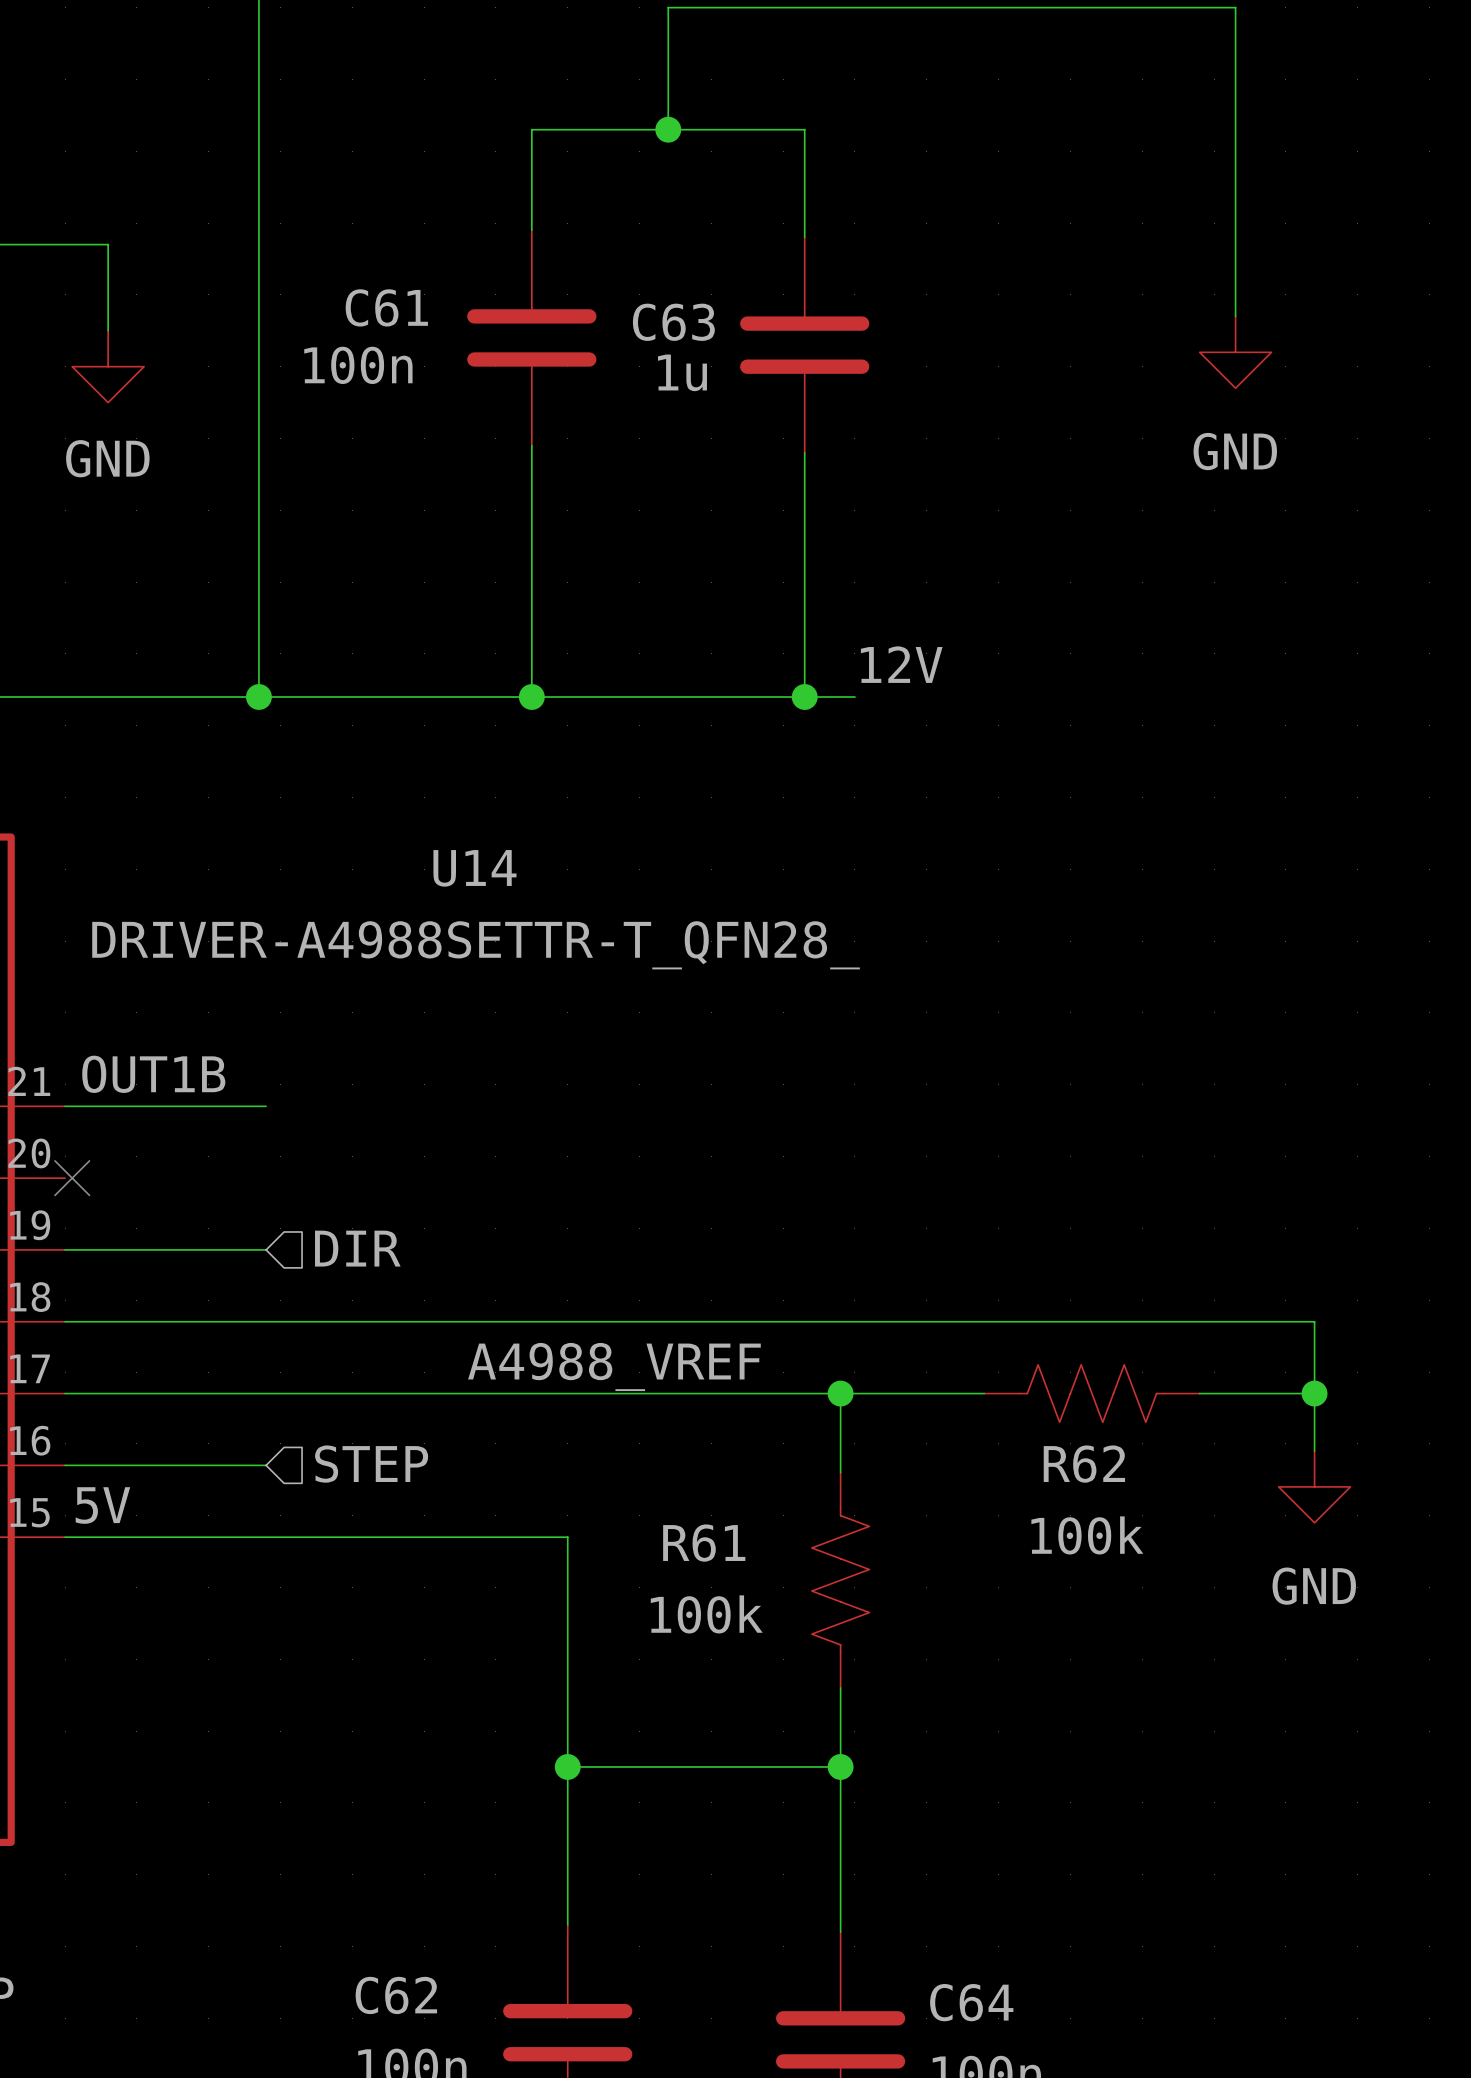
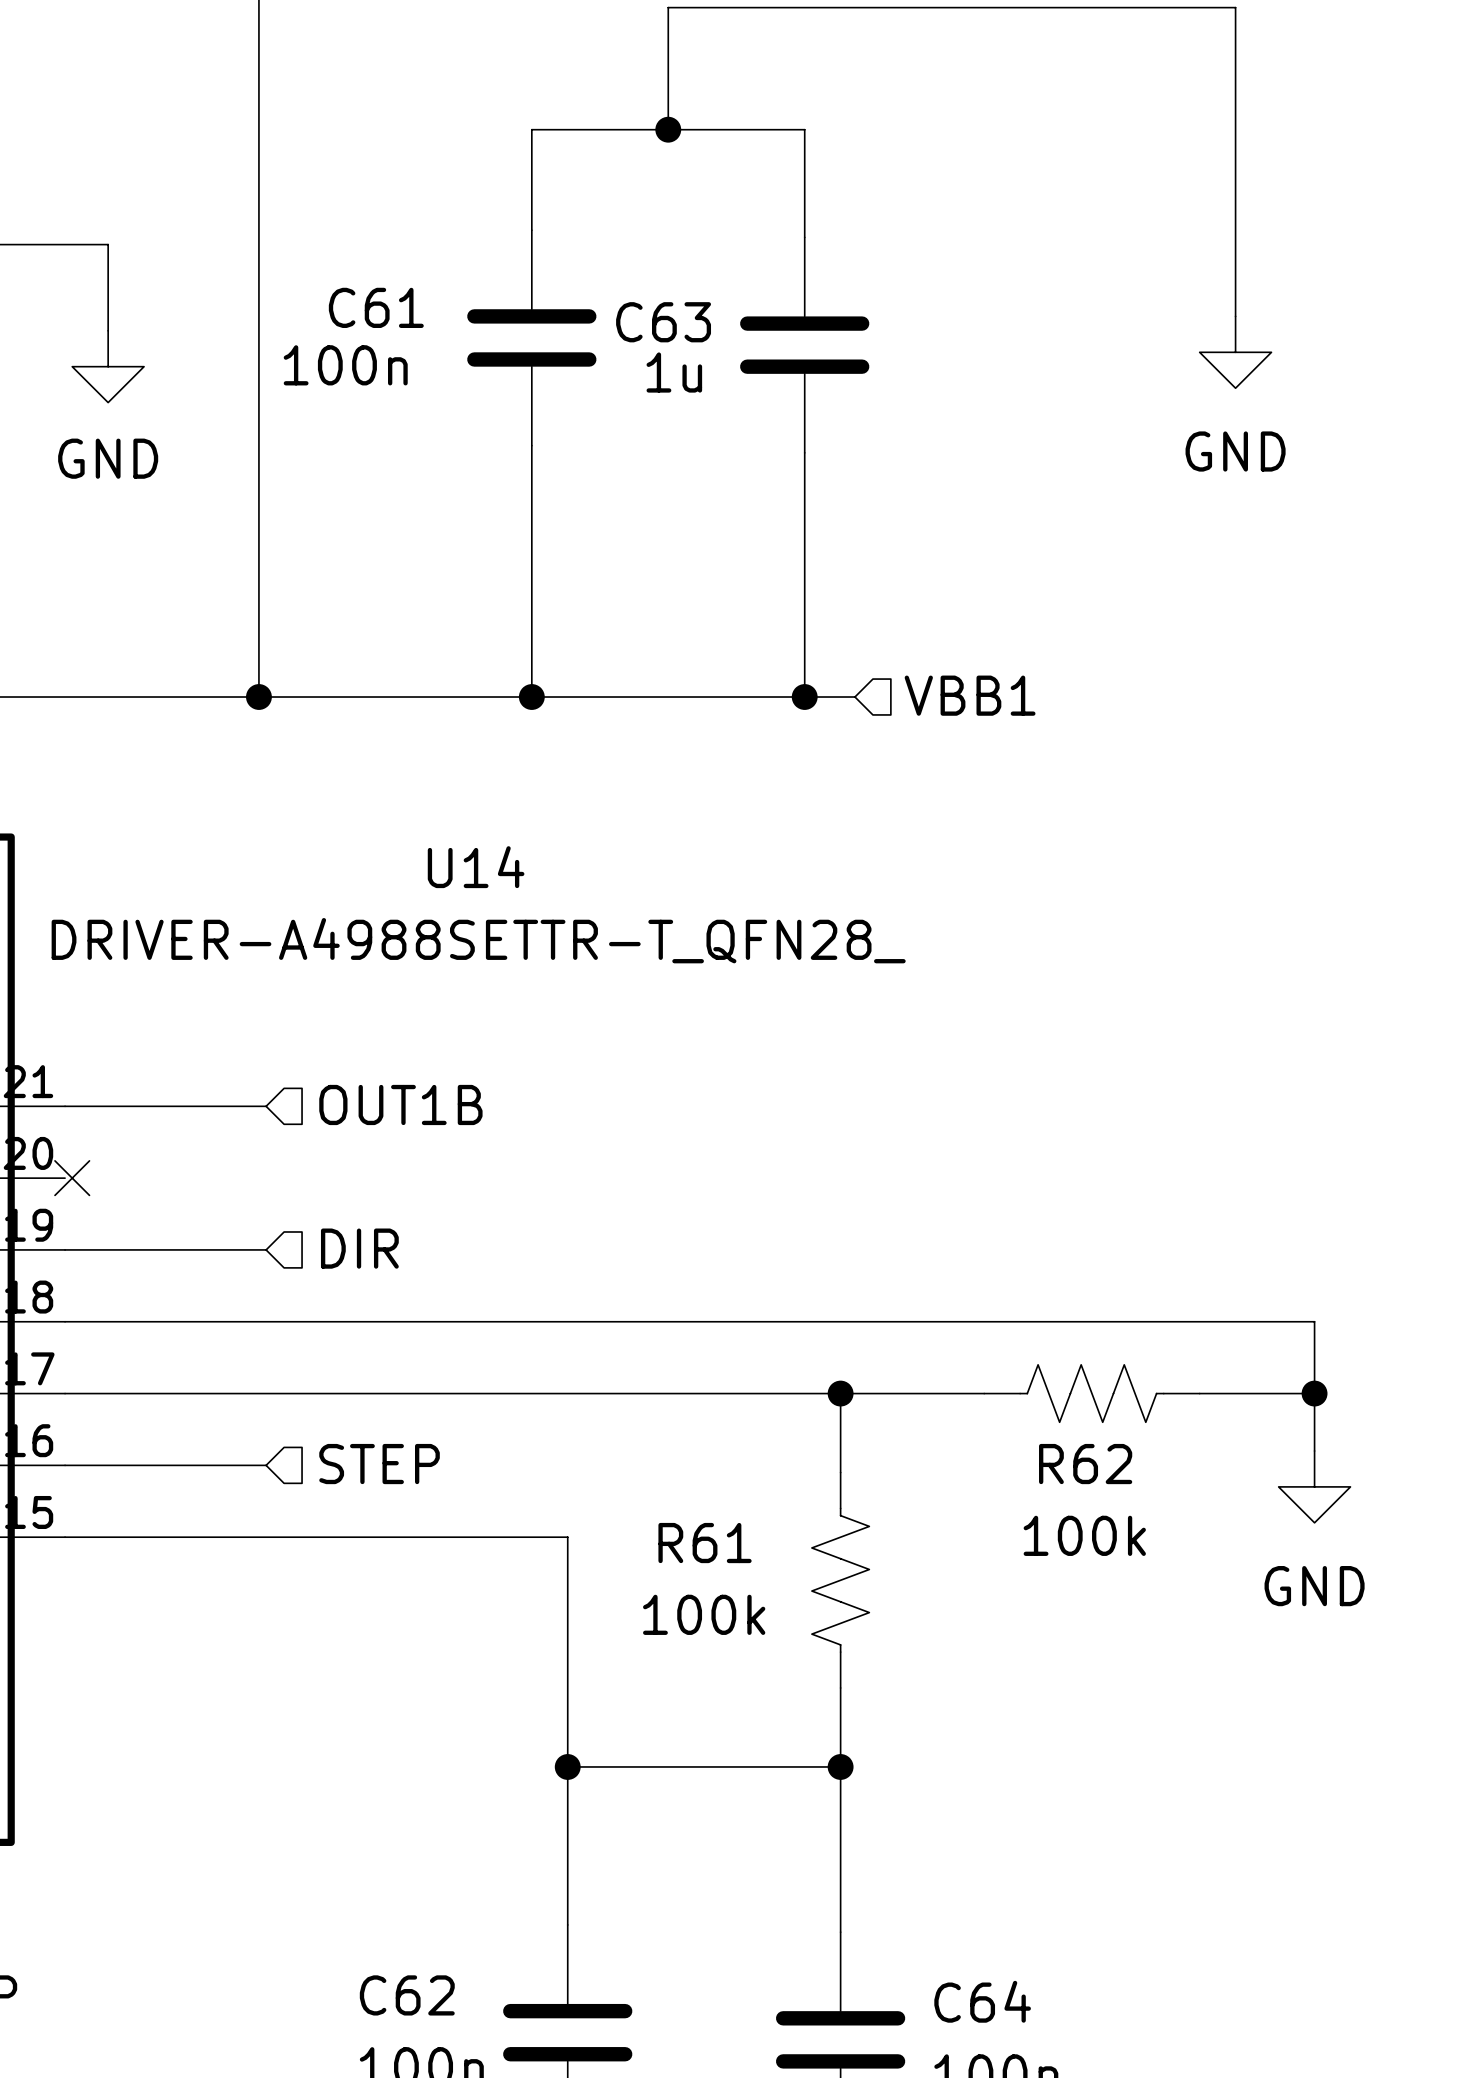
label: 12V (901, 664) -> none
hierarchical label: none -> VBB1 (970, 695)
label: OUT1B (153, 1074) -> none
hierarchical label: none -> OUT1B (400, 1104)
label: A4988_VREF (614, 1367) -> none
label: 5V (102, 1505) -> none

